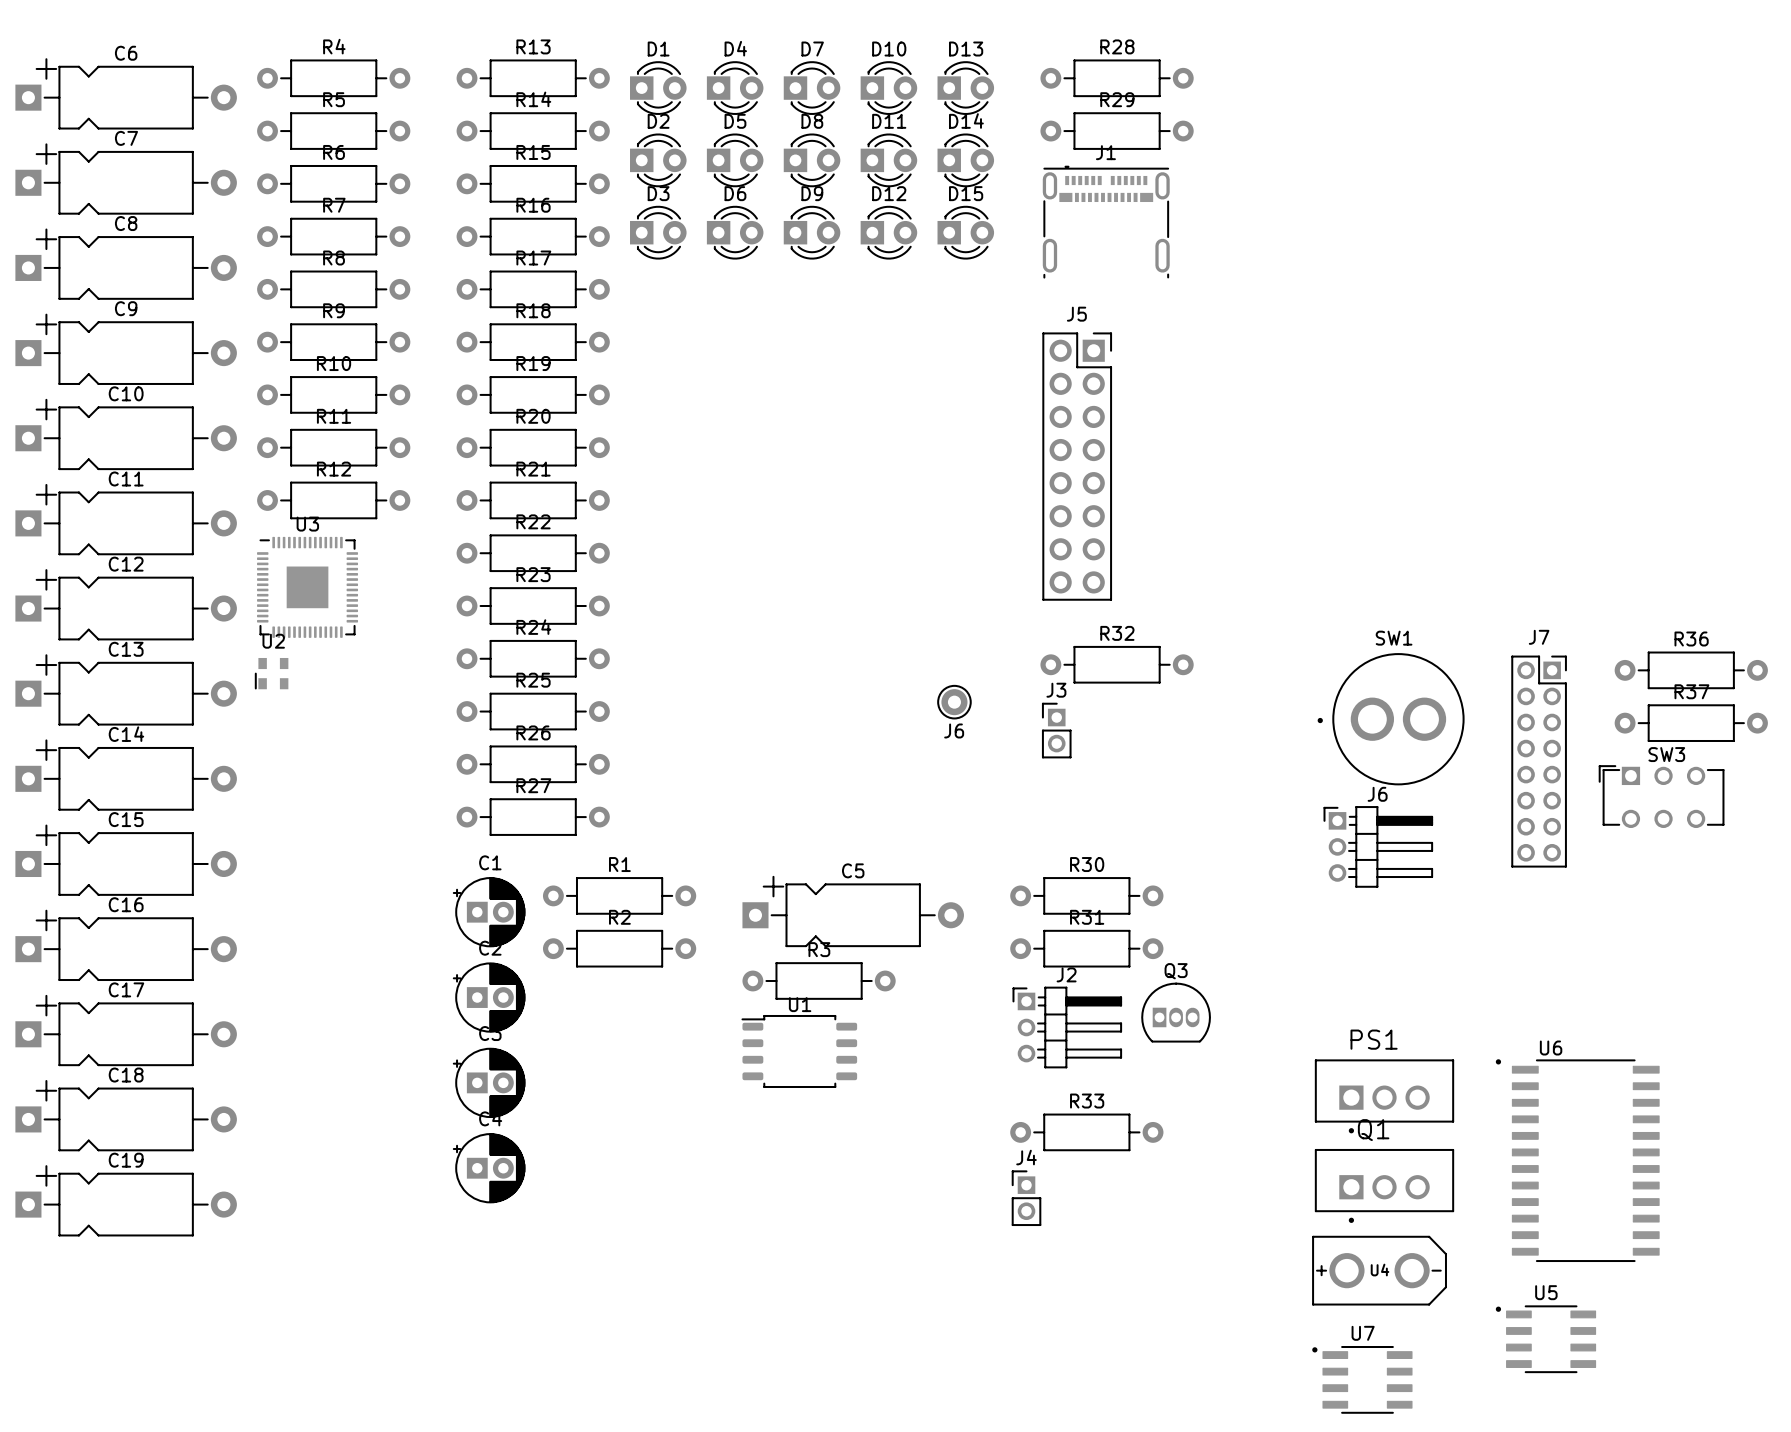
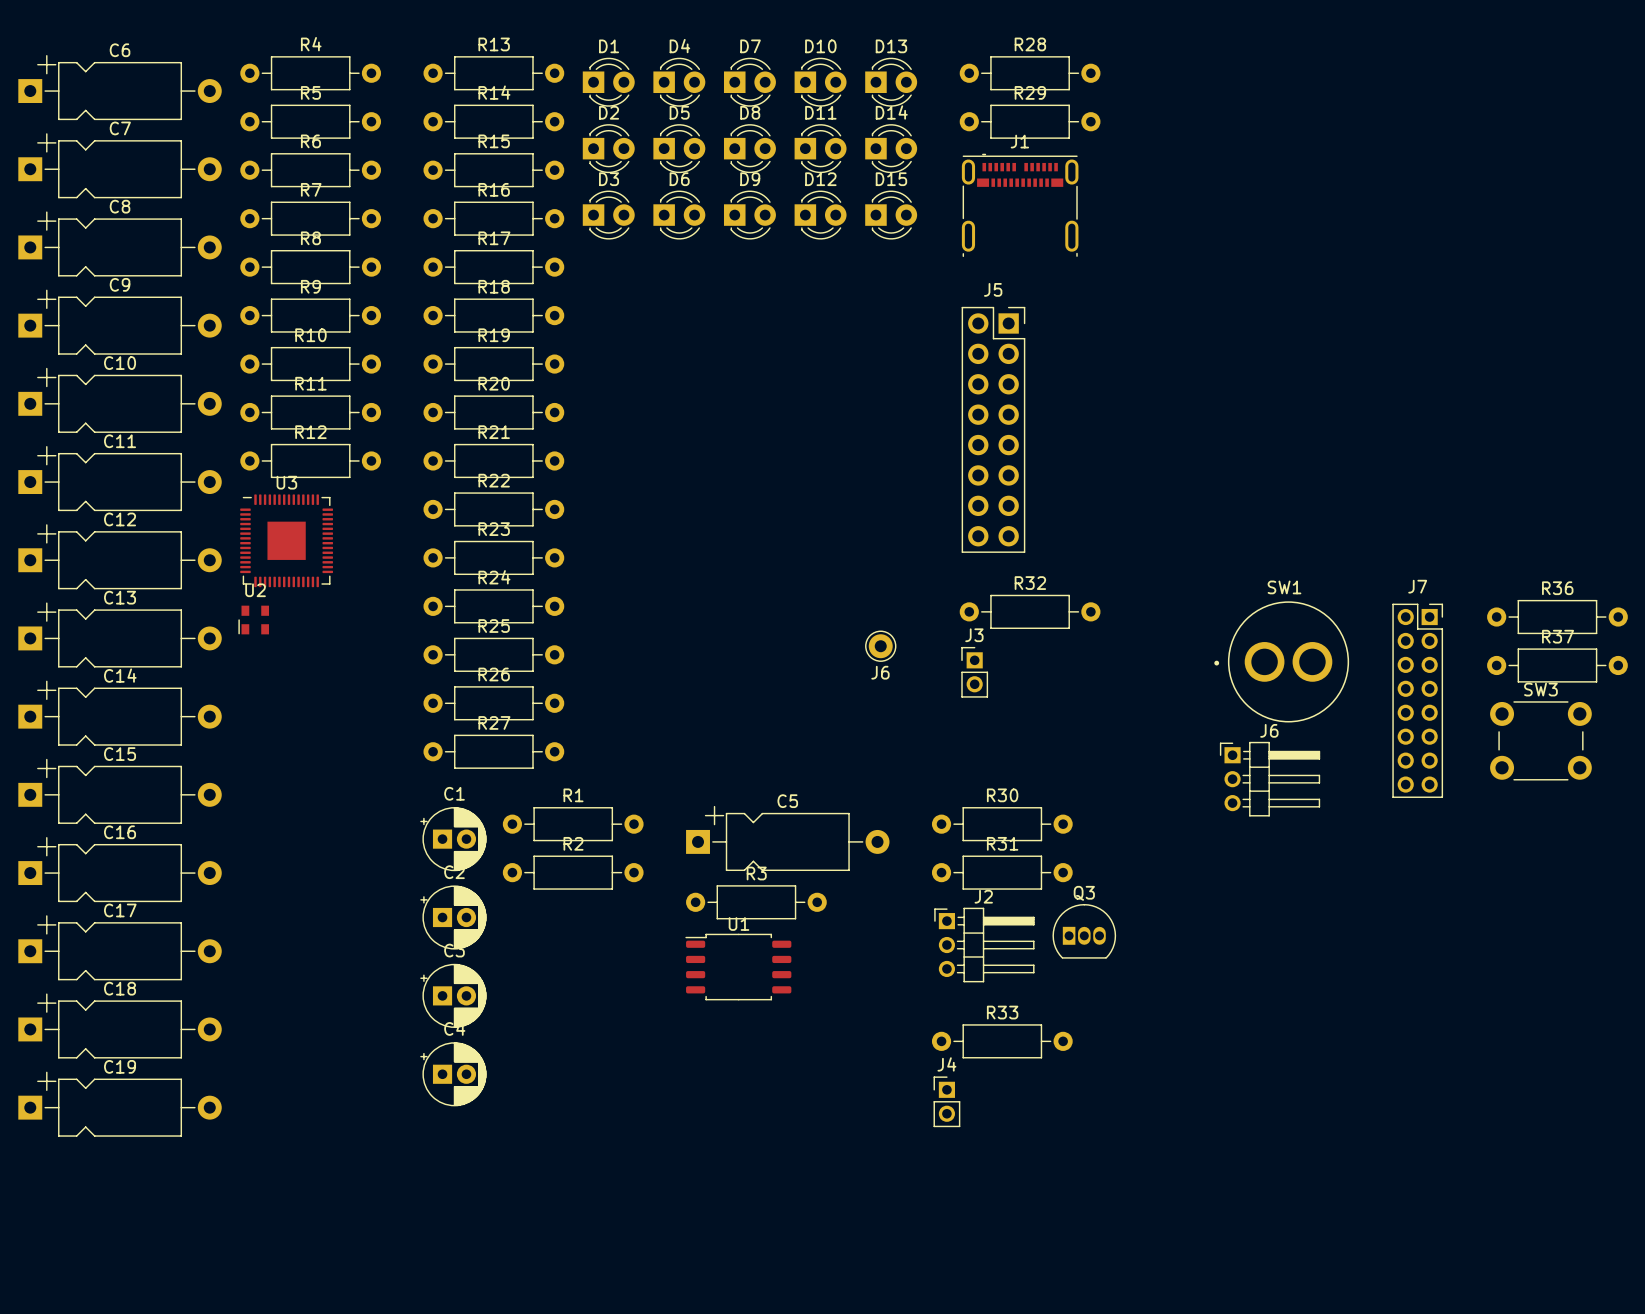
SW3 footprint: [1598, 765, 1725, 829] -> [1490, 701, 1592, 781]
PS1: (1384, 1096) -> none
U6: (1577, 1160) -> none
Q1: (1384, 1186) -> none
U4: (1379, 1270) -> none
U5: (1545, 1339) -> none
U7: (1362, 1379) -> none

